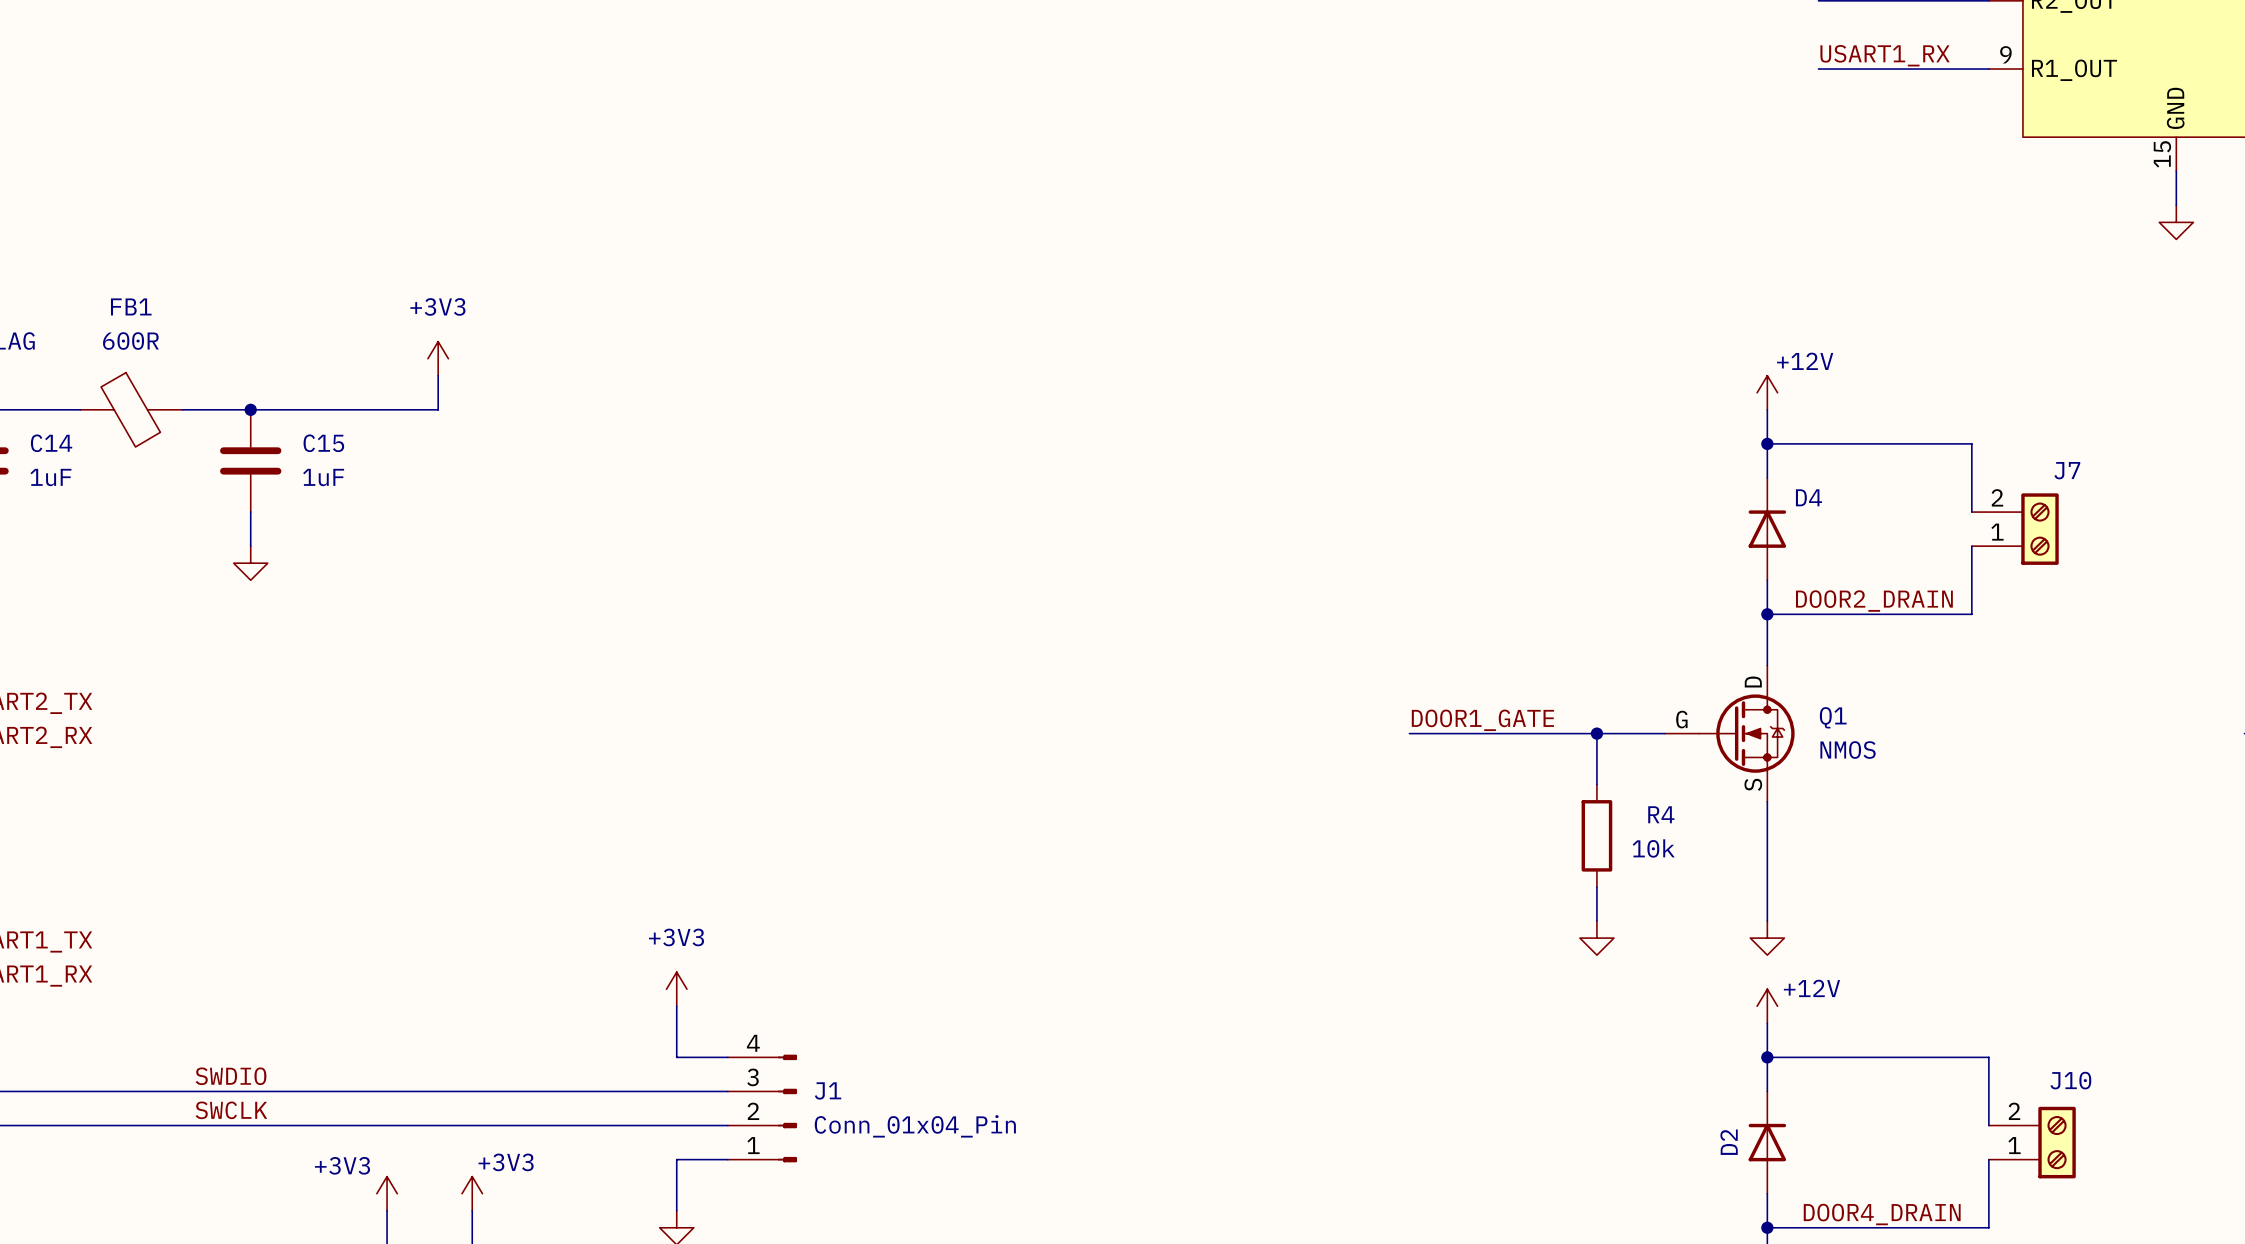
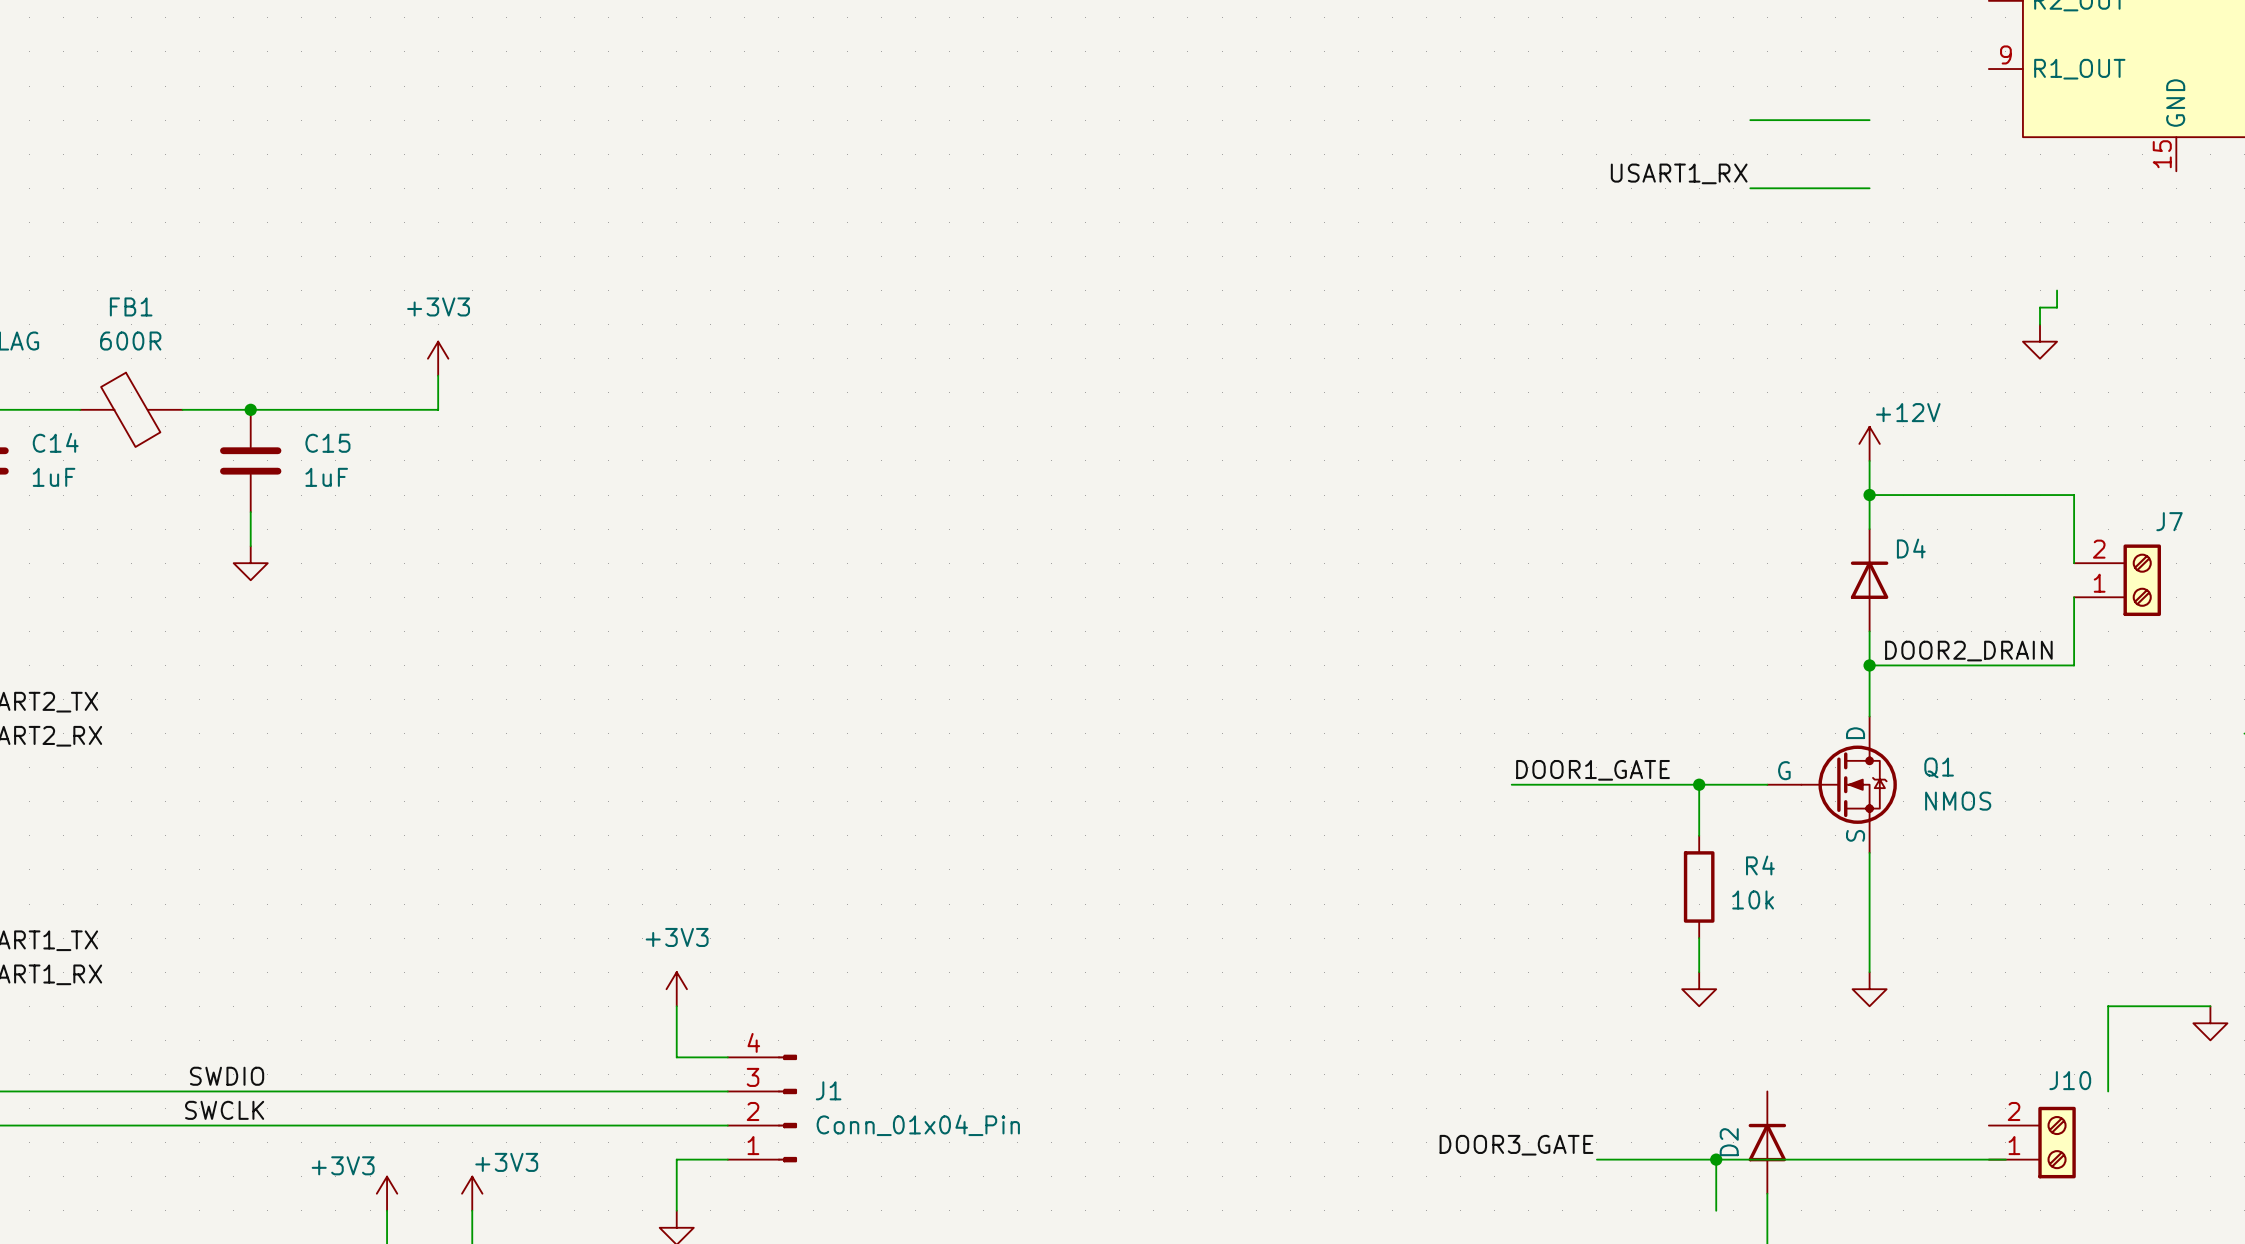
wire: (1818, 0) (1988, 0) -> none
label position: USART1_RX (1885, 55) -> USART1_RX (1679, 173)
wire: (1818, 69) (1988, 69) -> none
wire: none -> (1750, 120) (1869, 120)
wire: (2176, 171) (2176, 205) -> none
wire: none -> (1750, 188) (1869, 188)
power symbol: (2176, 222) -> none
wire: none -> (2057, 290) (2057, 307) (2040, 307) (2040, 324)
power symbol: none -> (2040, 341)
power symbol position: +12V (1767, 392) -> +12V (1869, 443)
wire: (1767, 409) (1767, 477) -> (1869, 460) (1869, 529)
wire: (1767, 443) (1971, 443) (1971, 512) -> (1869, 495) (2074, 495) (2074, 563)
junction: (1767, 443) -> none
junction: none -> (1869, 495)
D4 position: (1767, 529) -> (1869, 580)
J7 position: (2015, 529) -> (2117, 580)
wire: (1971, 546) (1971, 614) (1767, 614) -> (2074, 597) (2074, 665) (1869, 665)
wire: (1767, 580) (1767, 665) -> (1869, 631) (1869, 716)
label position: DOOR2_DRAIN (1874, 601) -> DOOR2_DRAIN (1968, 651)
junction: (1767, 614) -> none
junction: none -> (1869, 665)
label position: DOOR1_GATE (1482, 720) -> DOOR1_GATE (1593, 770)
wire: (1409, 733) (1665, 733) -> (1511, 784) (1767, 784)
wire: (1596, 733) (1596, 784) -> (1699, 784) (1699, 835)
junction: (1596, 733) -> none
Q1 position: (1729, 733) -> (1832, 784)
junction: none -> (1699, 784)
wire: (1767, 801) (1767, 921) -> (1869, 852) (1869, 972)
R4 position: (1596, 835) -> (1699, 886)
wire: (1596, 886) (1596, 921) -> (1699, 938) (1699, 972)
power symbol: (1596, 938) -> none
power symbol: (1767, 938) -> none
power symbol: none -> (1699, 989)
power symbol: none -> (1869, 989)
power symbol: +12V (1767, 1006) -> none
wire: none -> (2210, 1006) (2108, 1006) (2108, 1091)
wire: (1767, 1023) (1767, 1091) -> none
power symbol: none -> (2210, 1023)
wire: (1767, 1057) (1988, 1057) (1988, 1125) -> none
junction: (1767, 1057) -> none
label: none -> DOOR3_GATE (1516, 1145)
wire: none -> (1596, 1159) (2005, 1159)
wire: none -> (1716, 1159) (1716, 1210)
junction: none -> (1716, 1159)
wire: (1988, 1159) (1988, 1227) (1767, 1227) -> none
label: DOOR4_DRAIN (1882, 1214) -> none
junction: (1767, 1227) -> none

